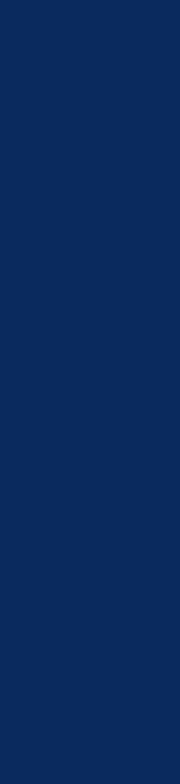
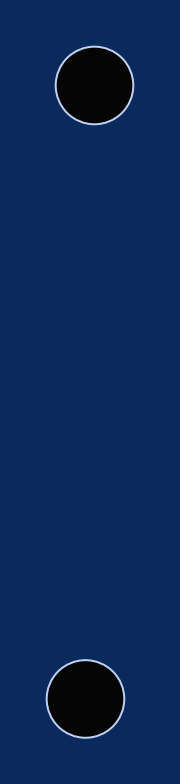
part: none -> (94, 85)
part: none -> (85, 698)

